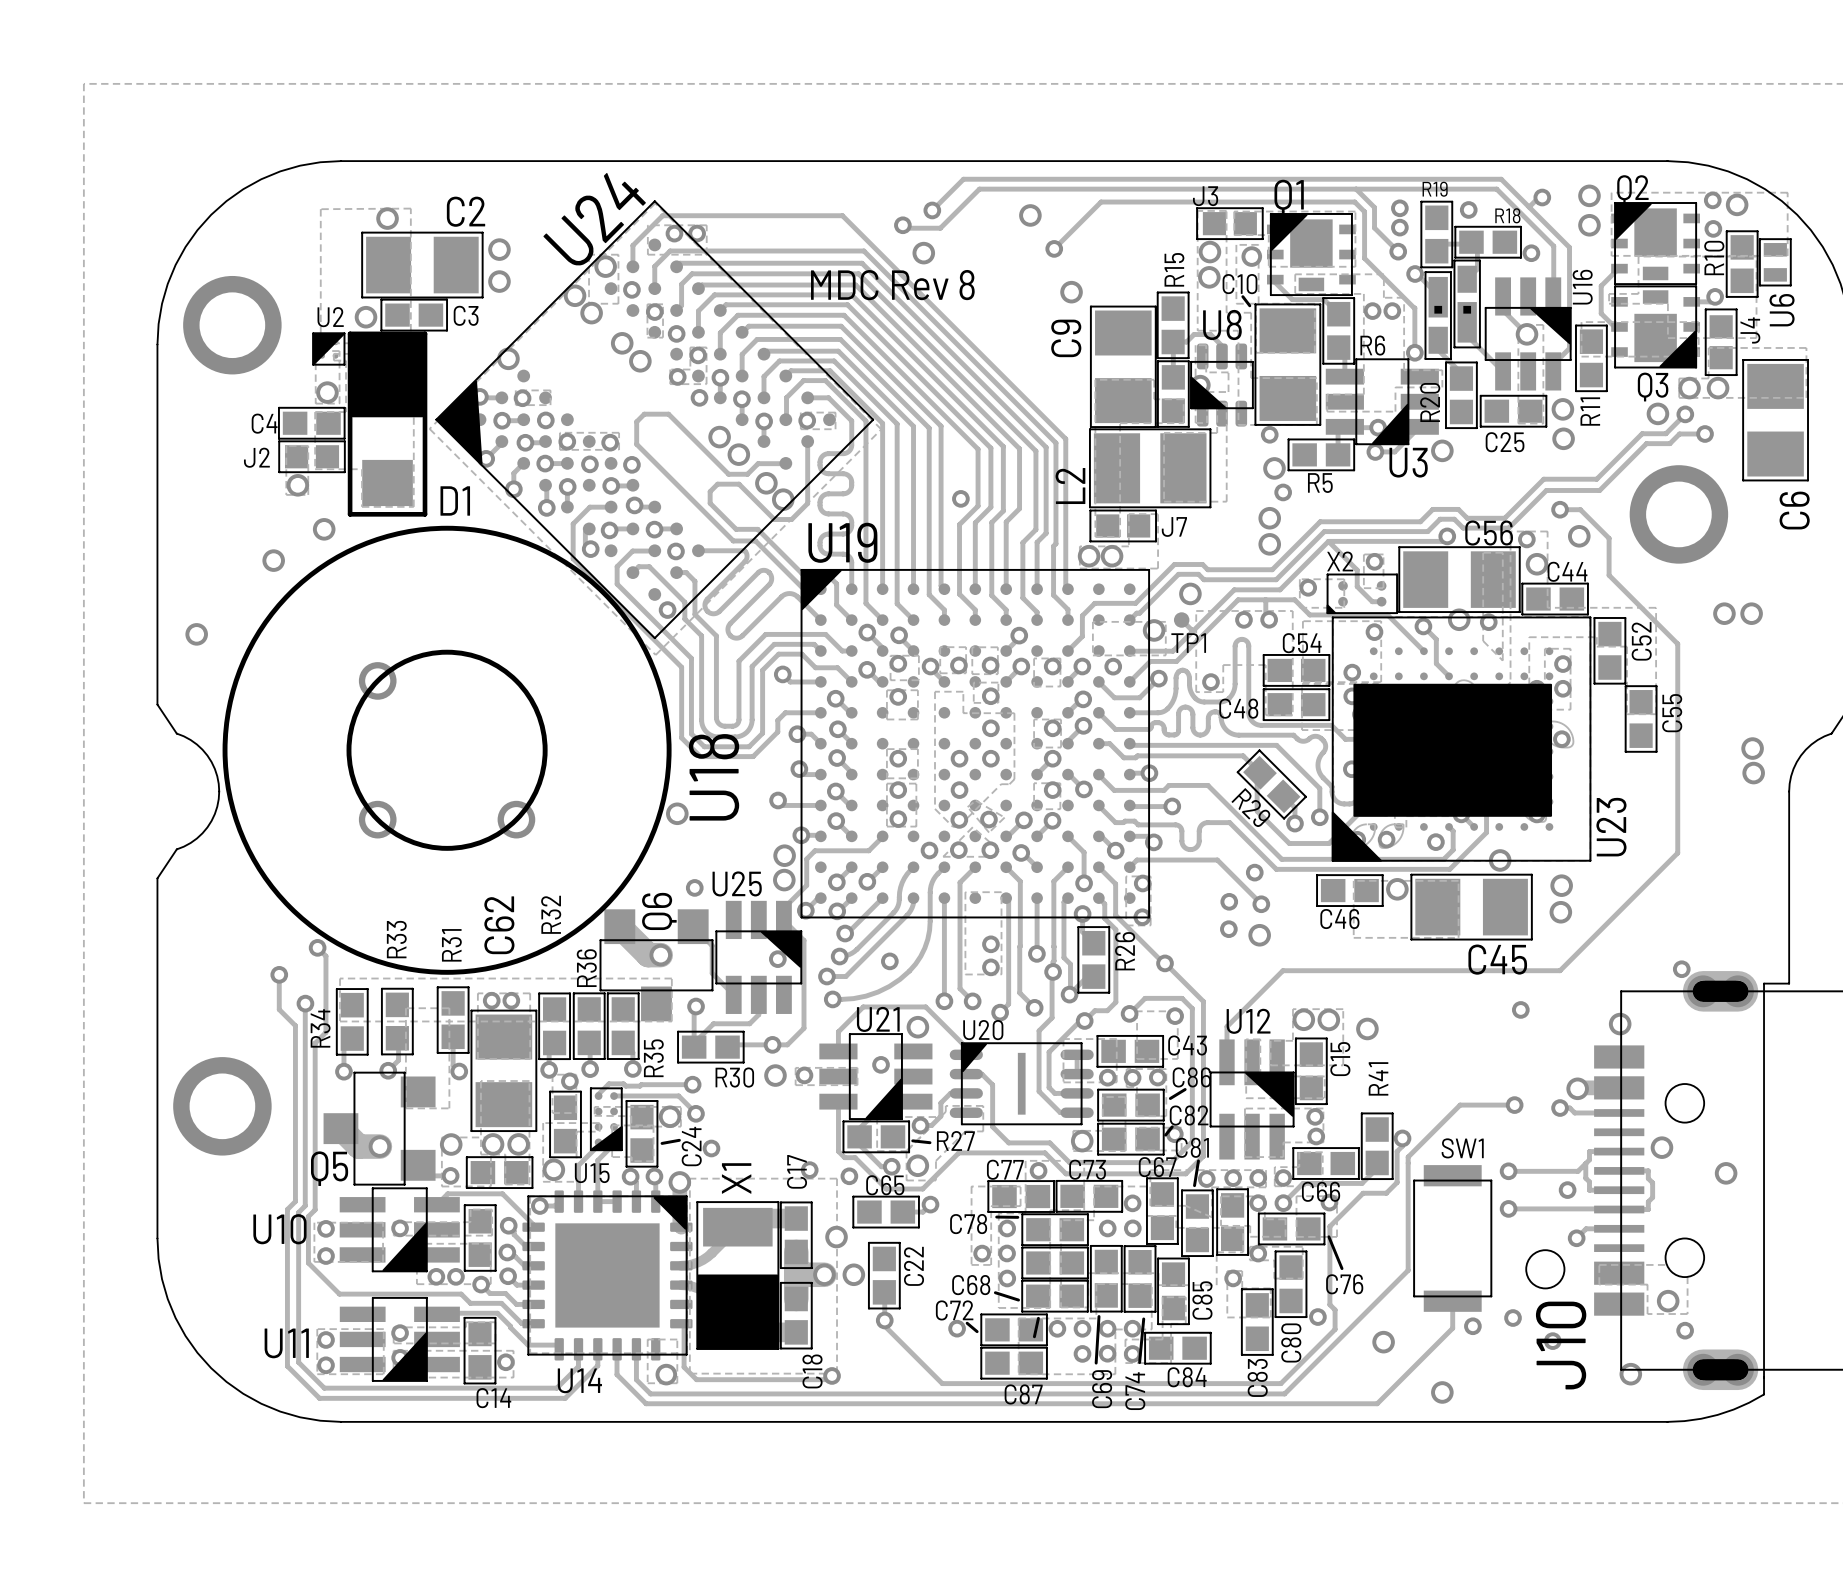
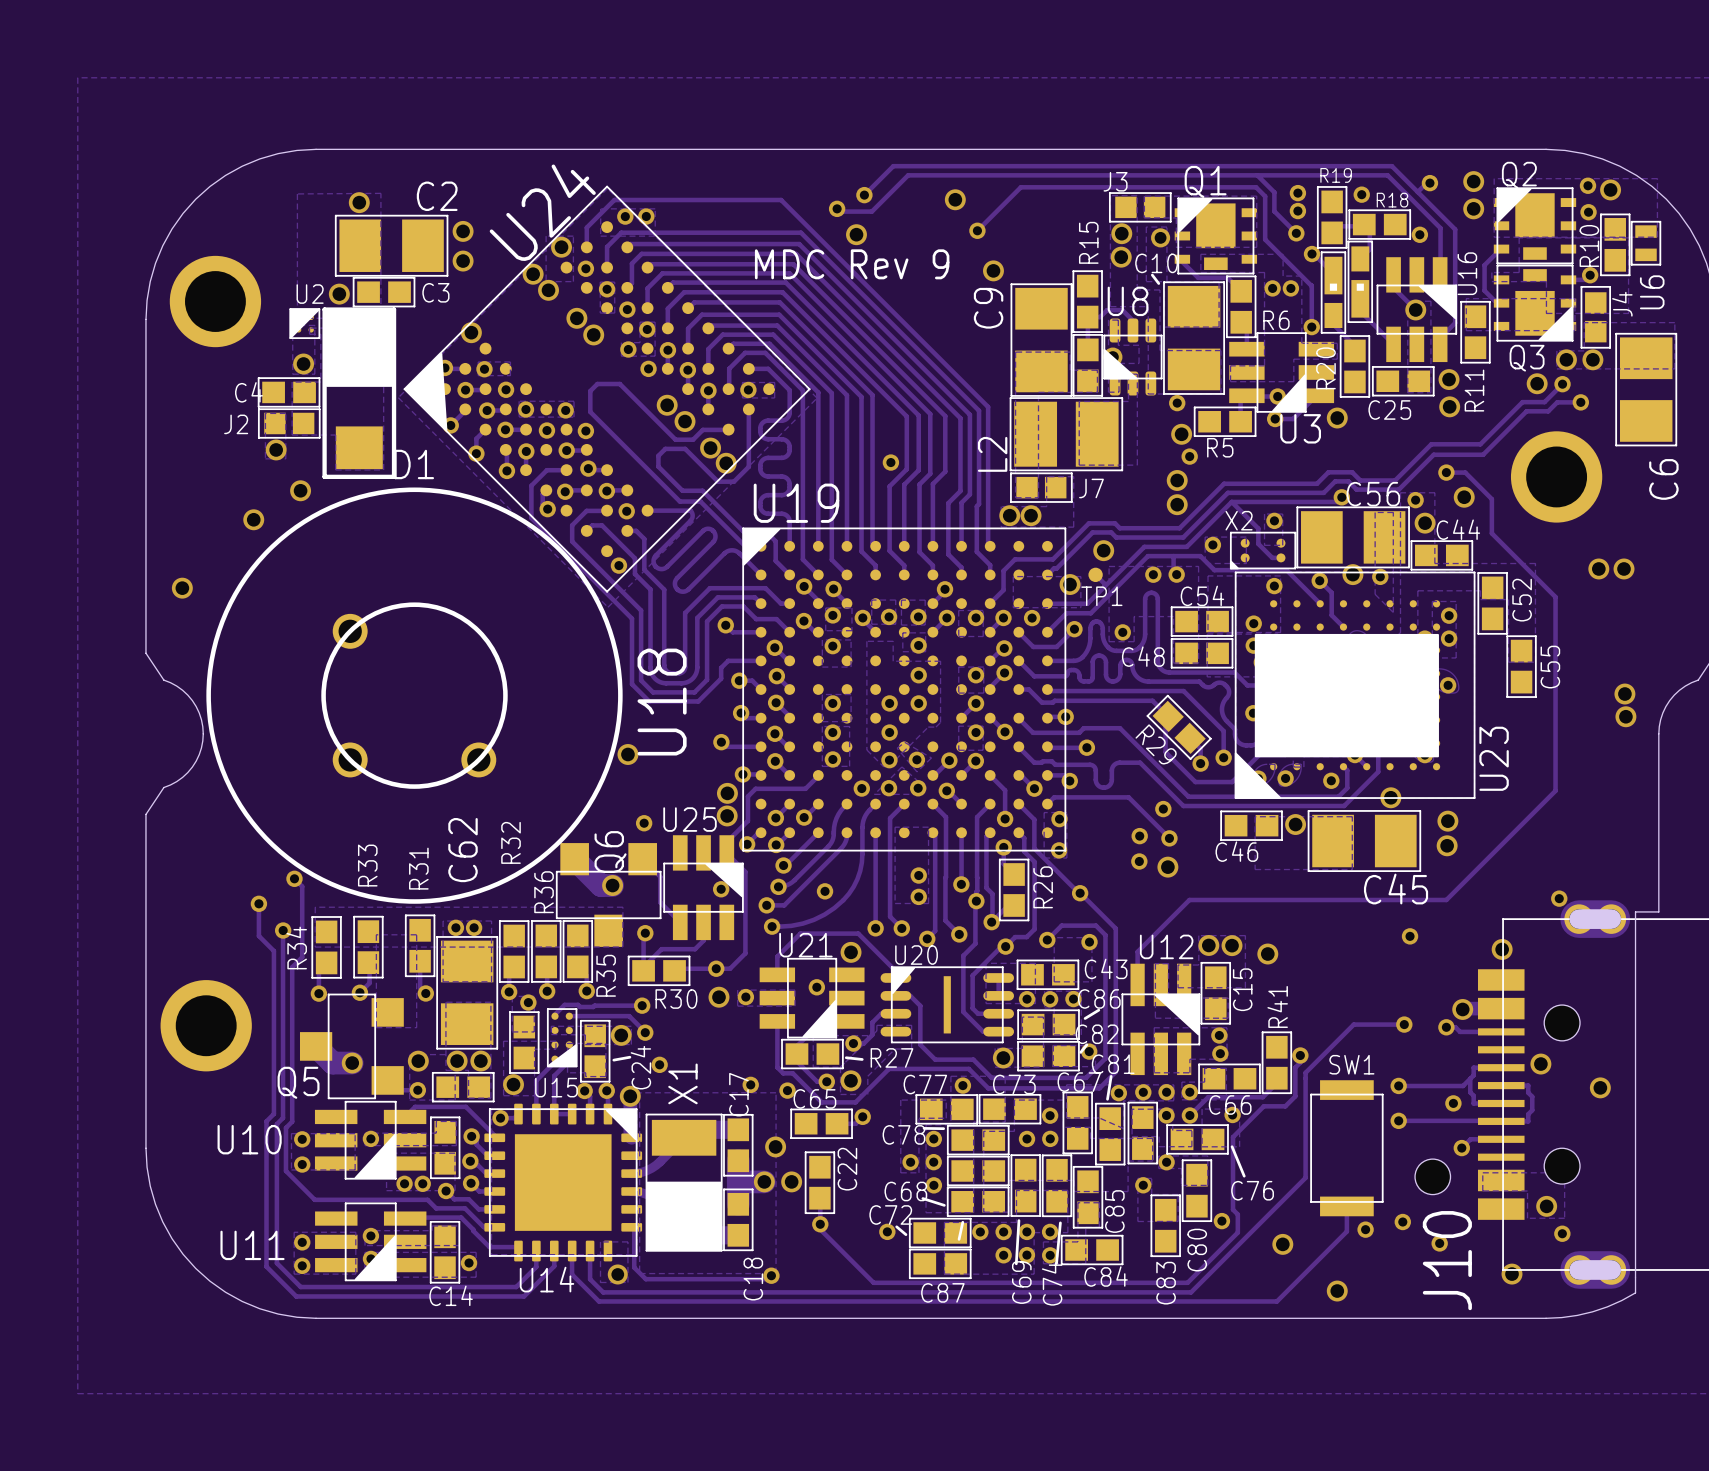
text: MDC Rev 8 (892, 285) -> MDC Rev 9 (852, 264)

